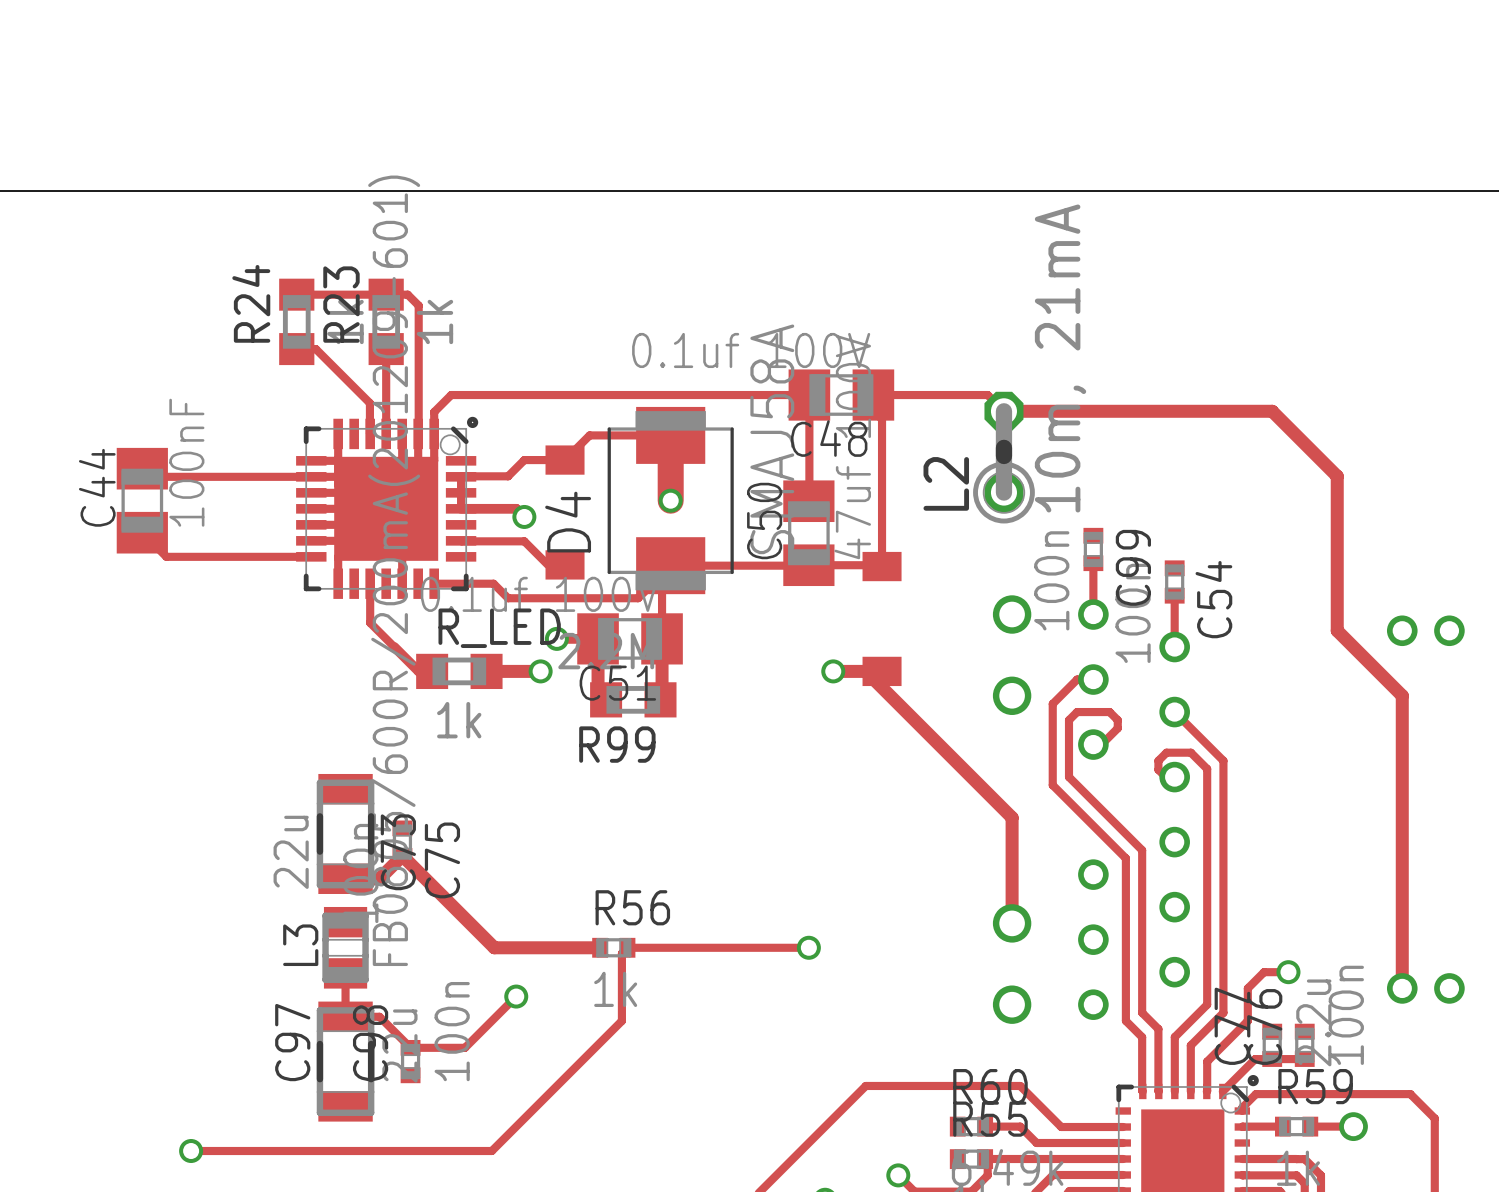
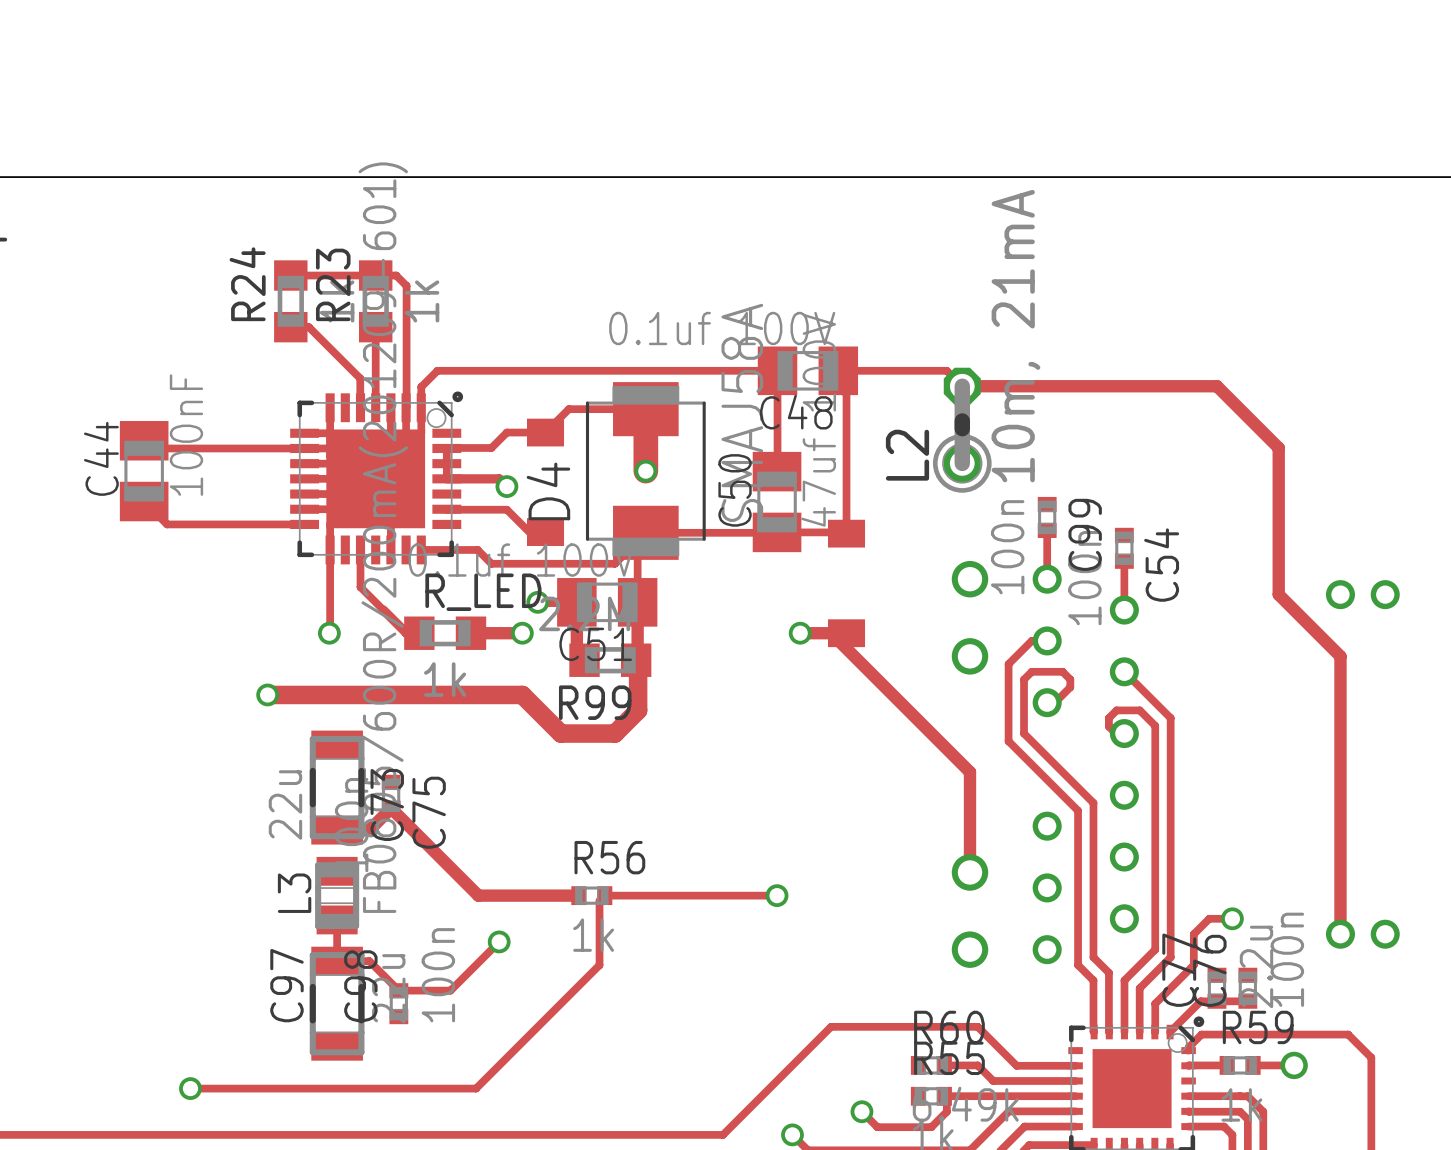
track: none -> (330, 549) (329, 633)
via: none -> (329, 633)
track: none -> (636, 660) (638, 662) (638, 710) (614, 733) (560, 733) (522, 694) (267, 694)
via: none -> (267, 694)

